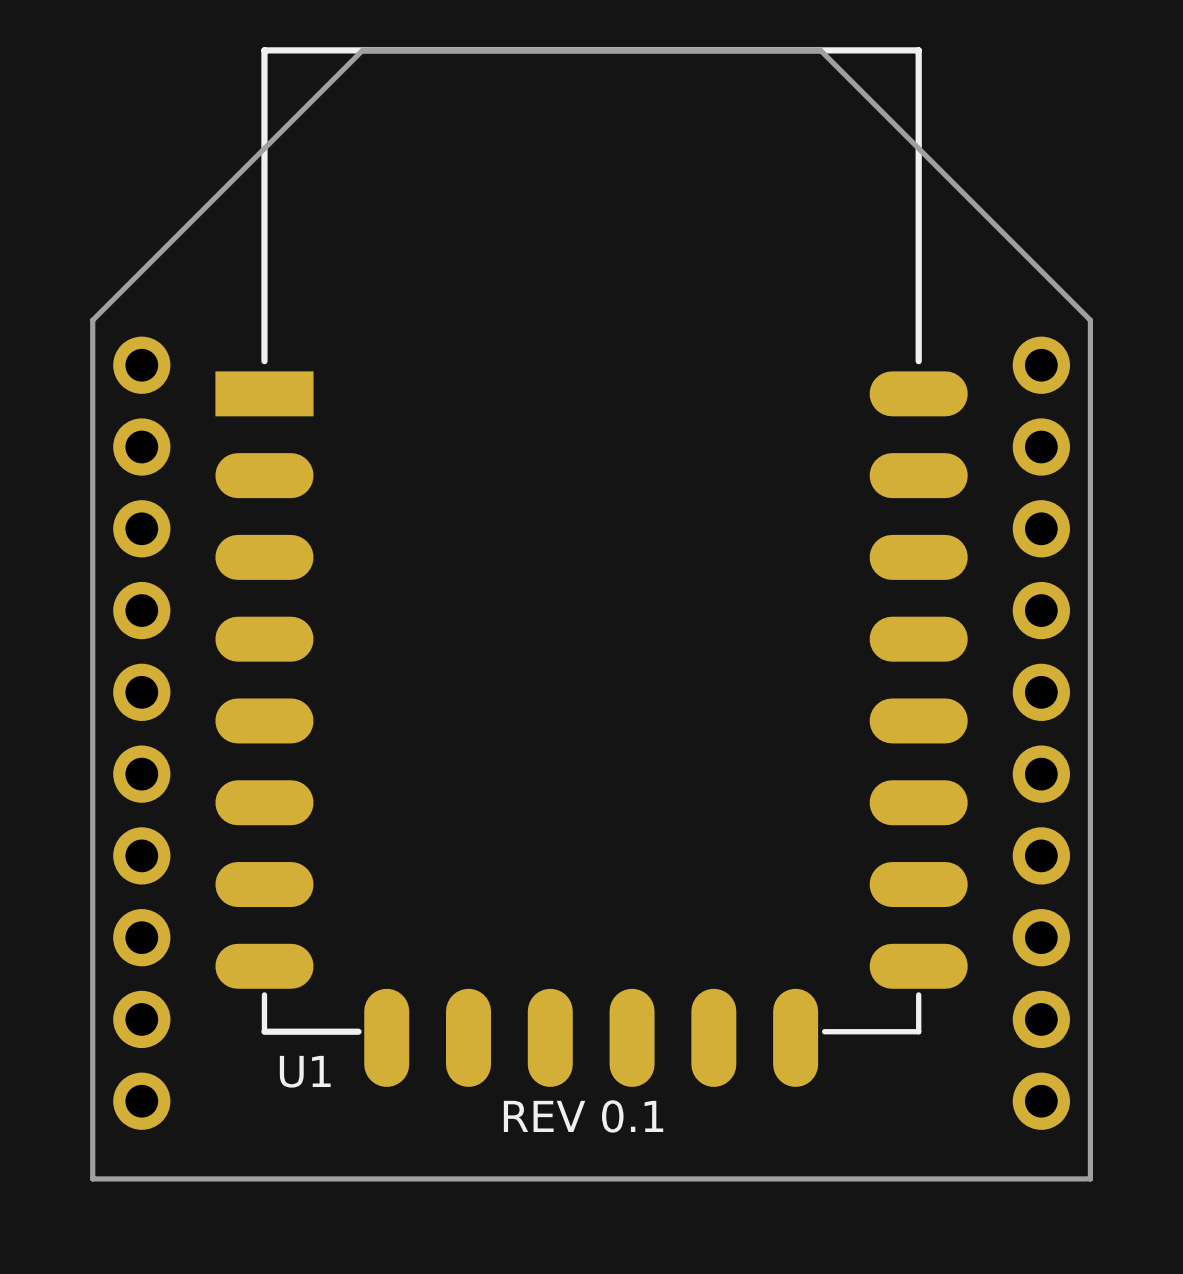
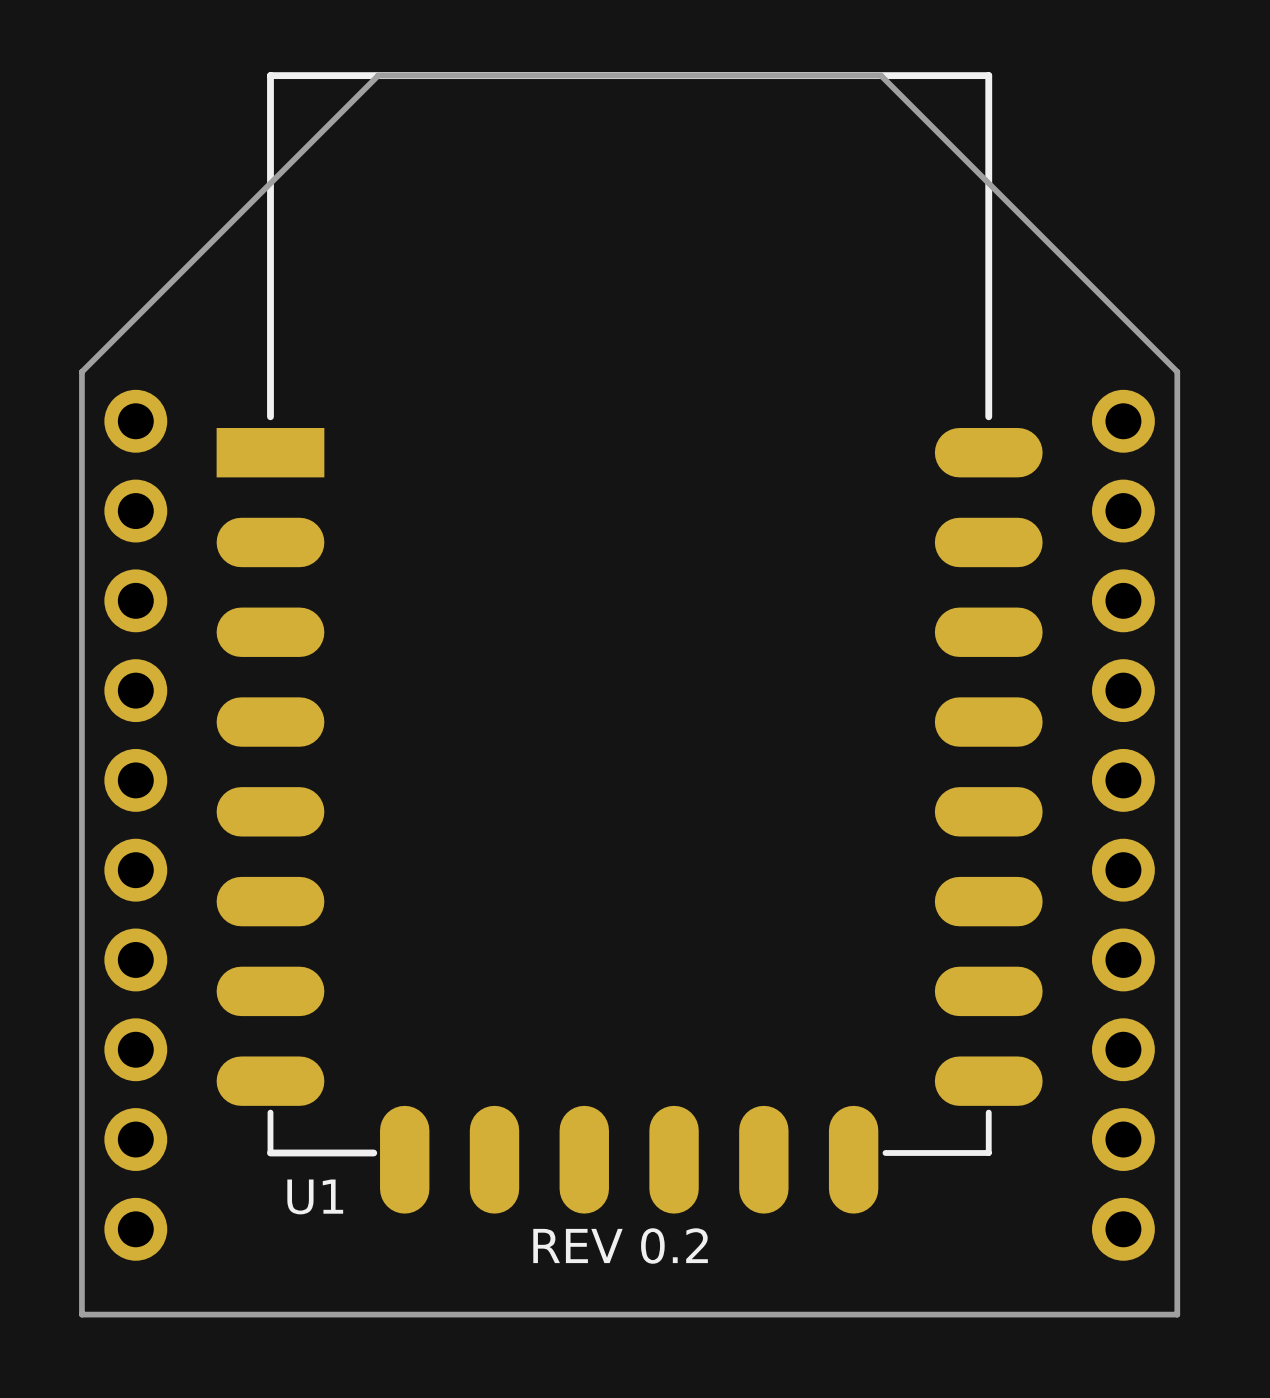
text: REV 0.1 (583, 1116) -> REV 0.2 (620, 1246)

